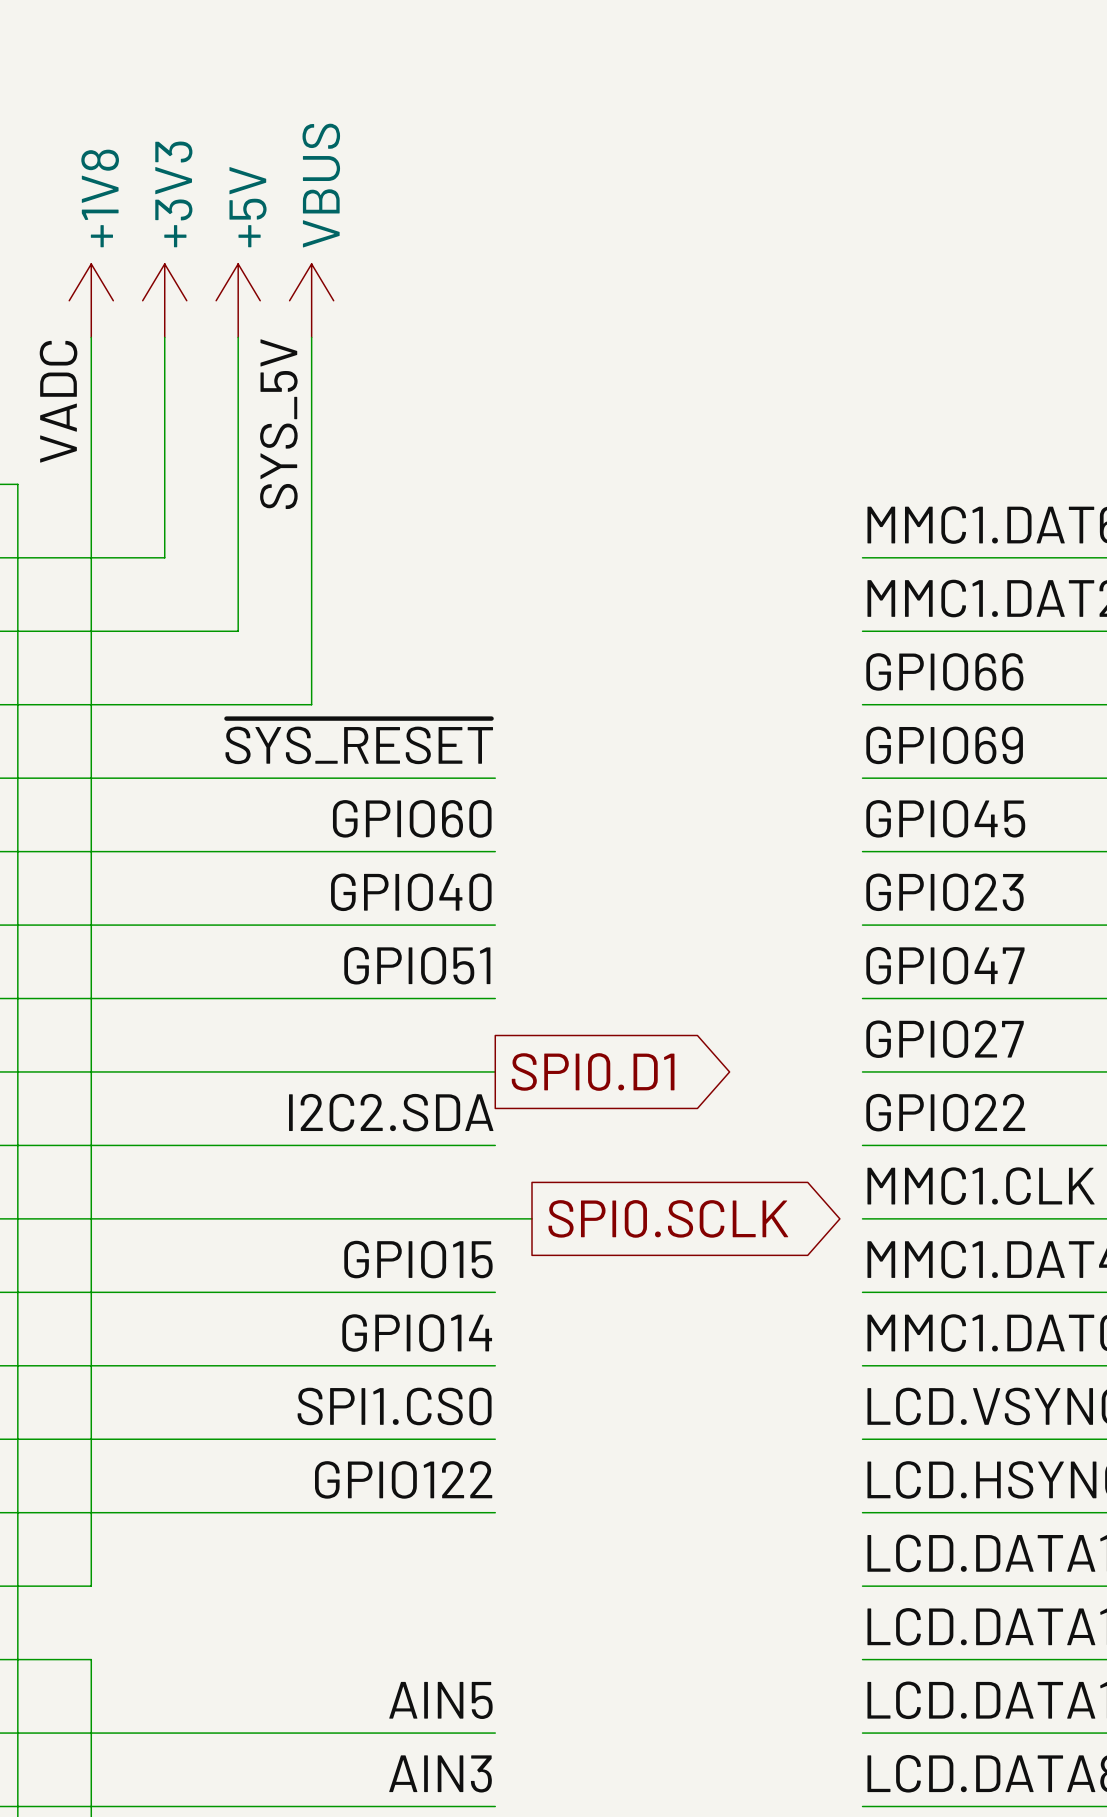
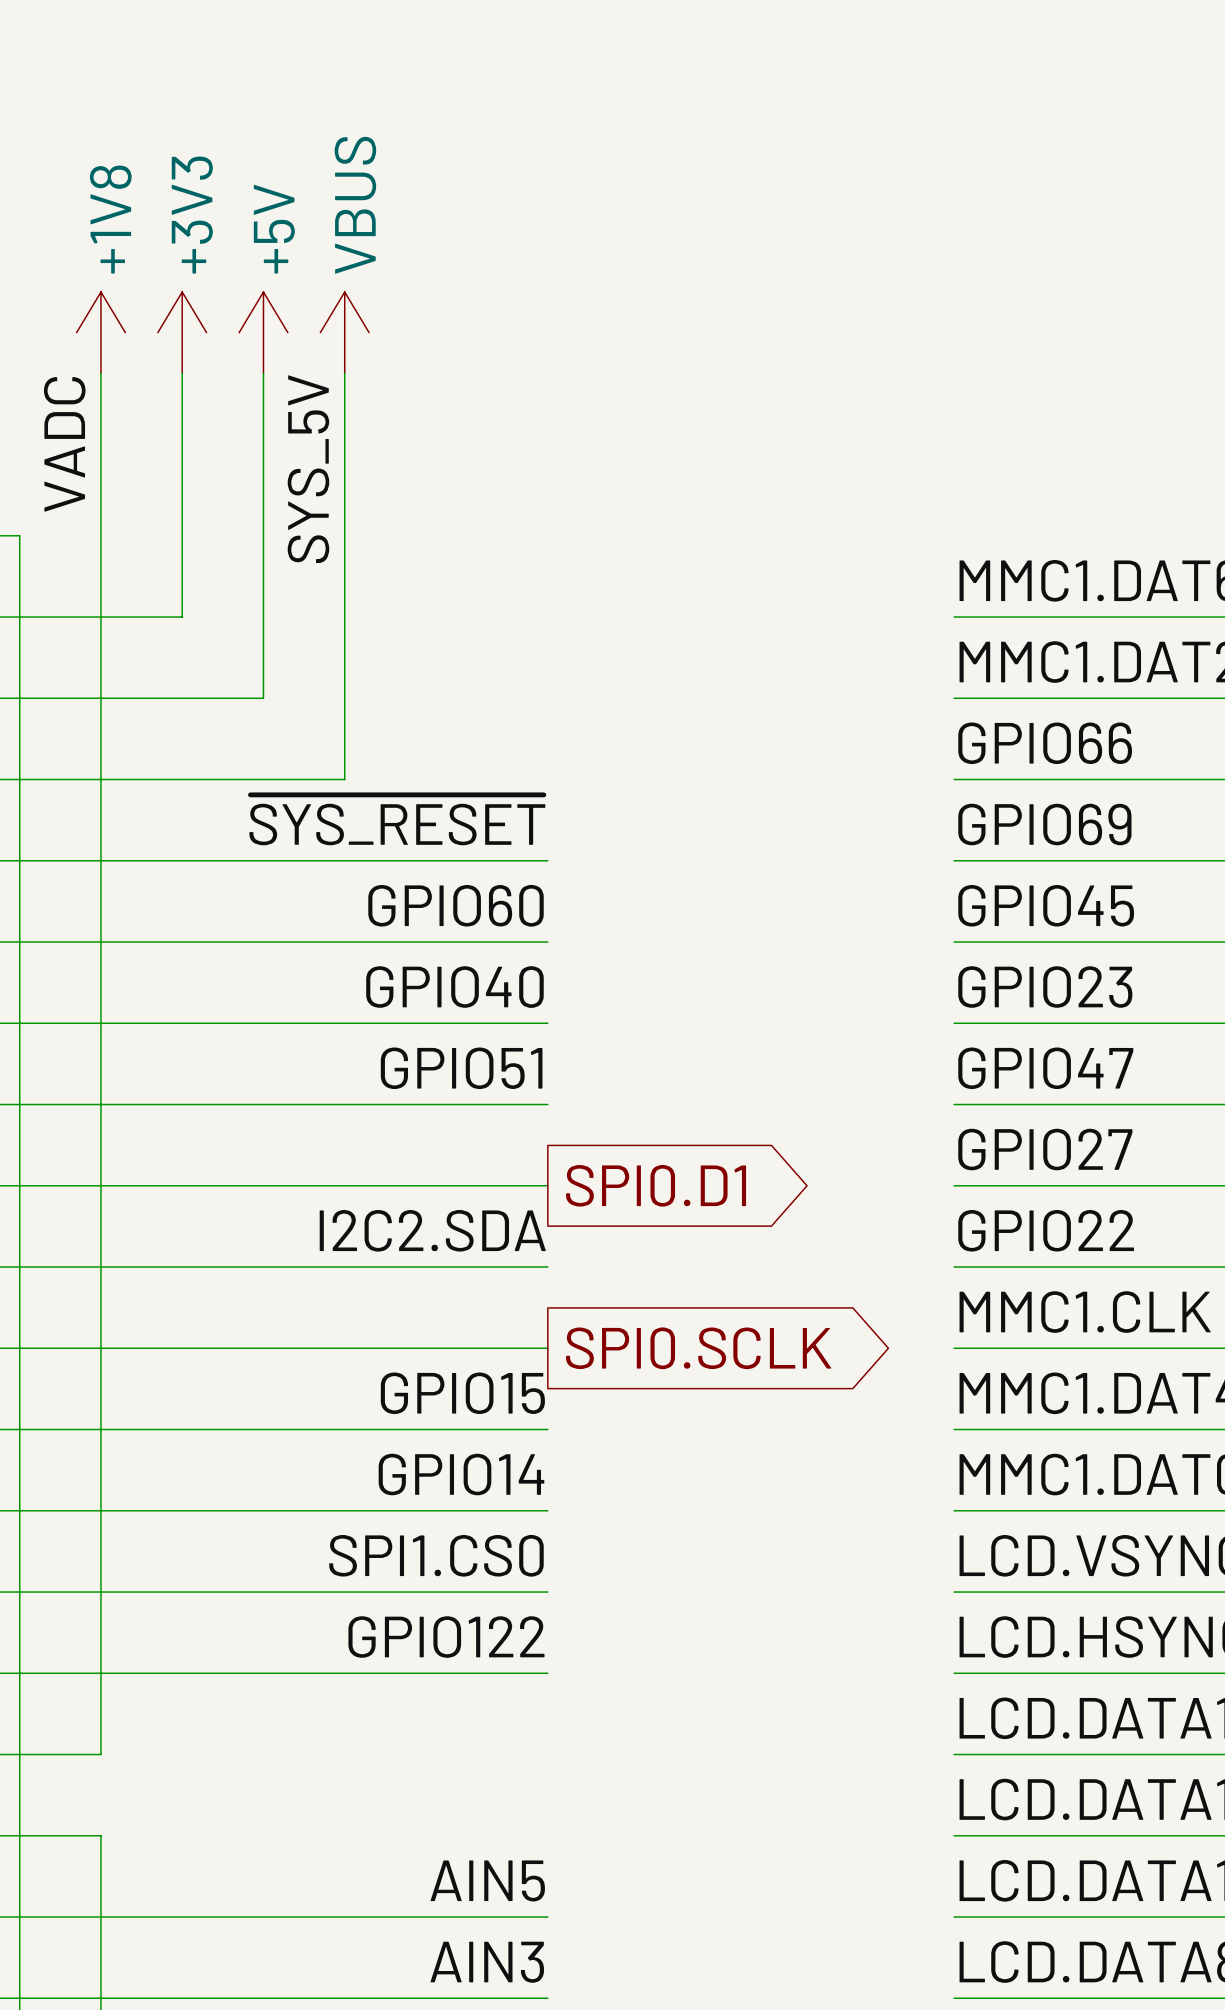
wire: (495, 1218) (531, 1218) -> none
global label position: SPI0.SCLK (668, 1218) -> SPI0.SCLK (698, 1348)

